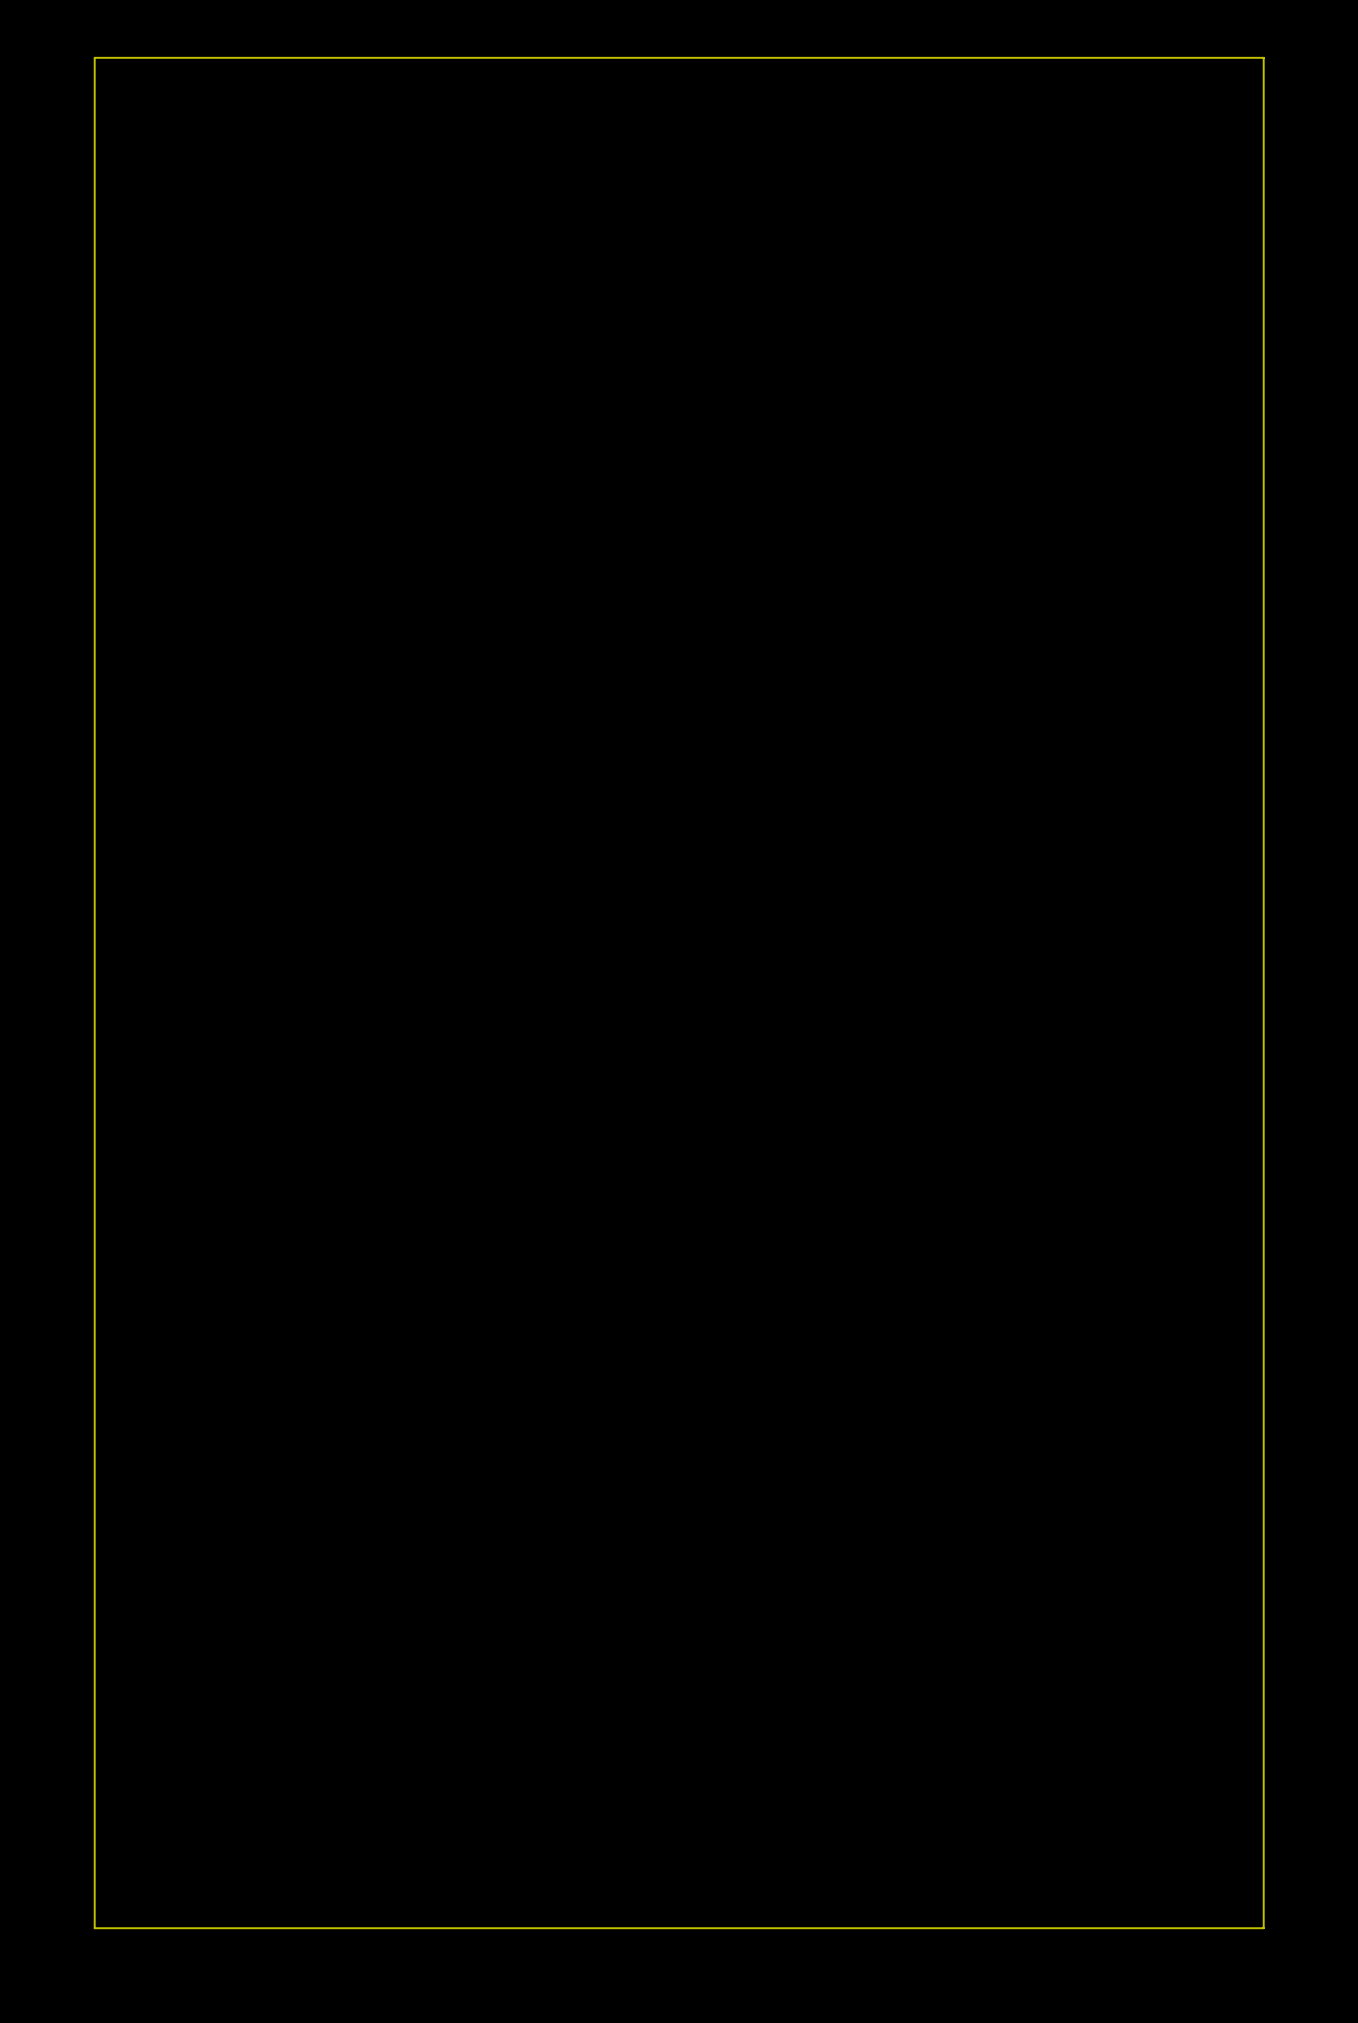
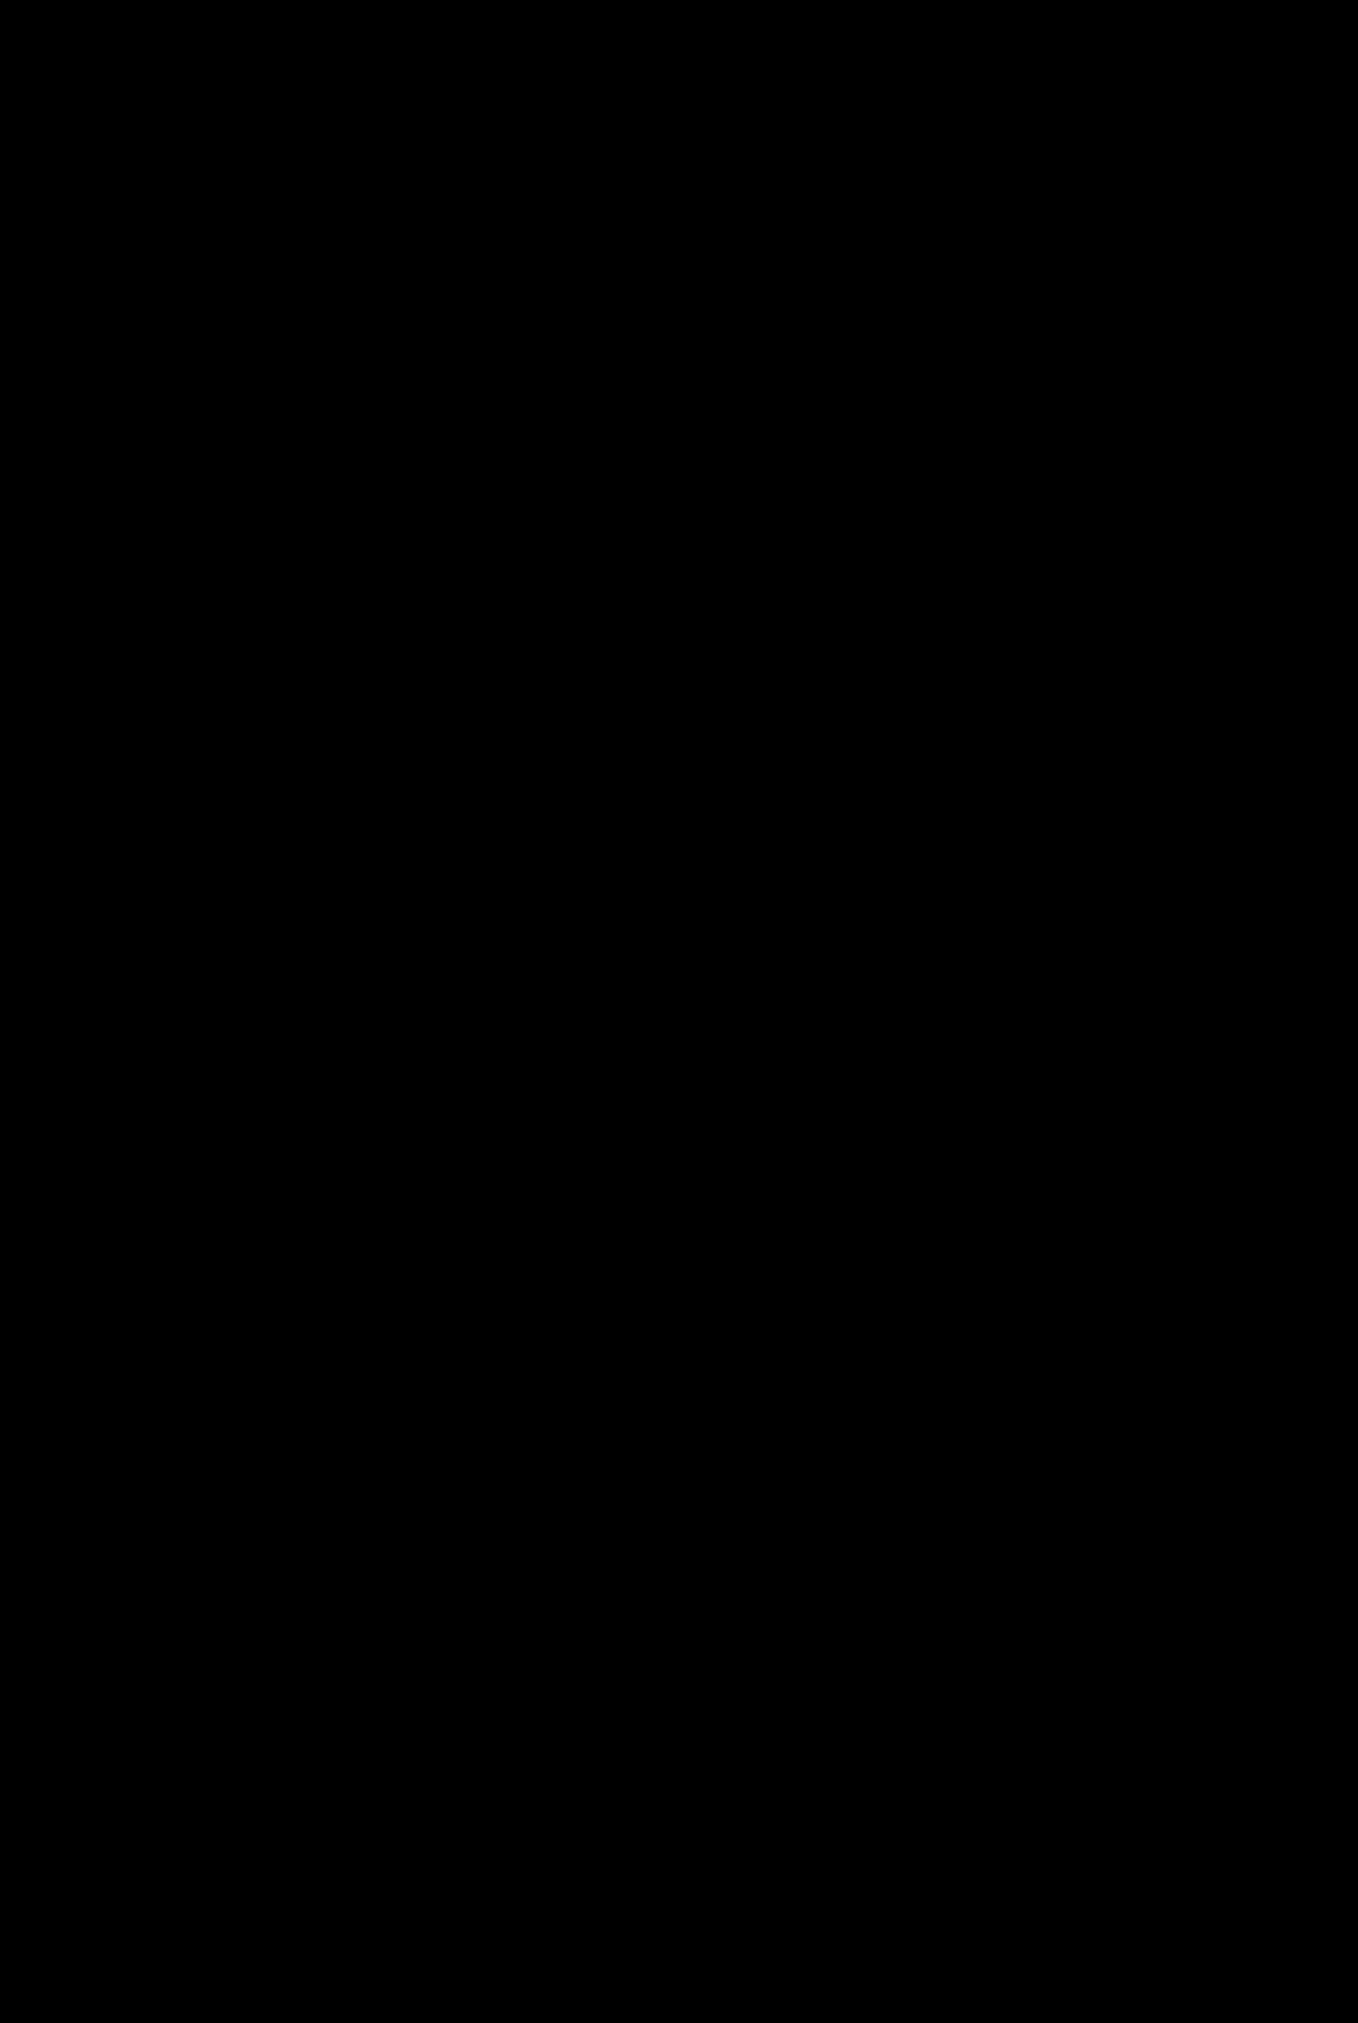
board edge: (94, 57) (94, 1928) (1263, 1928) (1263, 57) (94, 57) -> none

